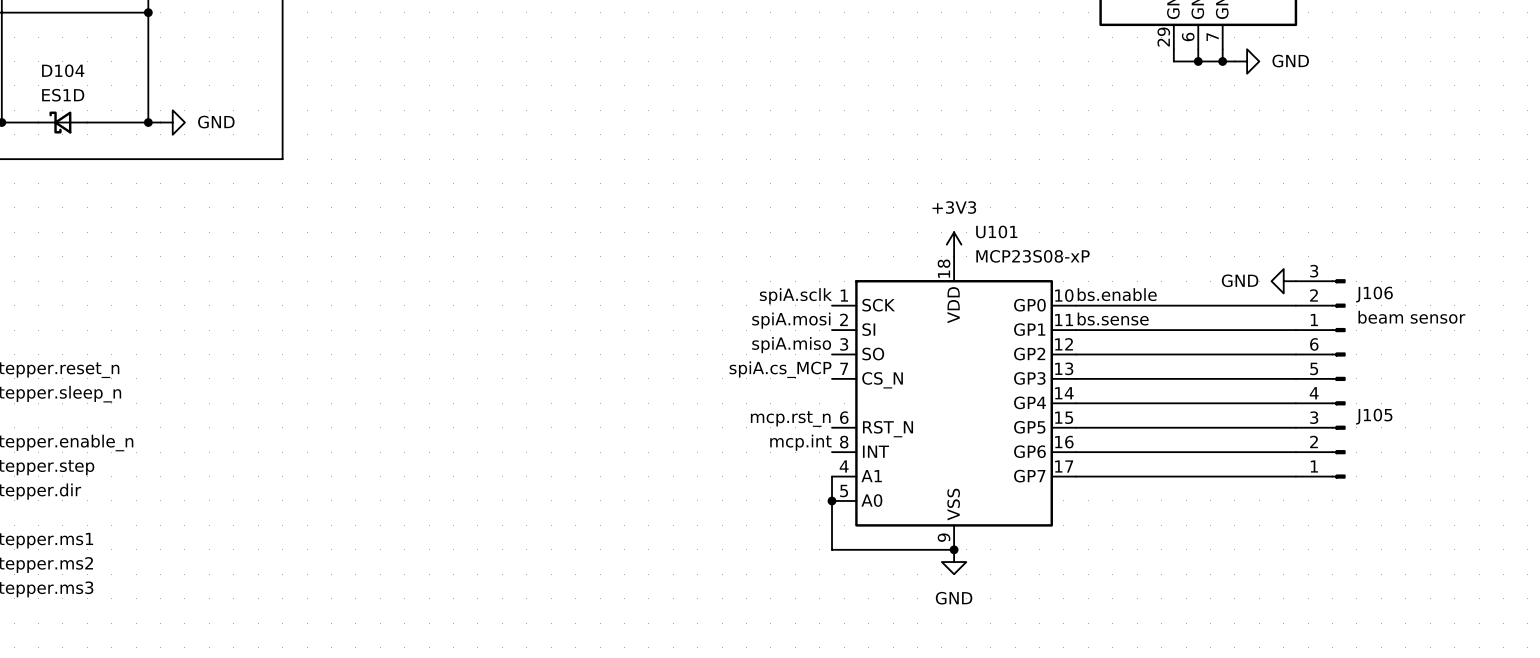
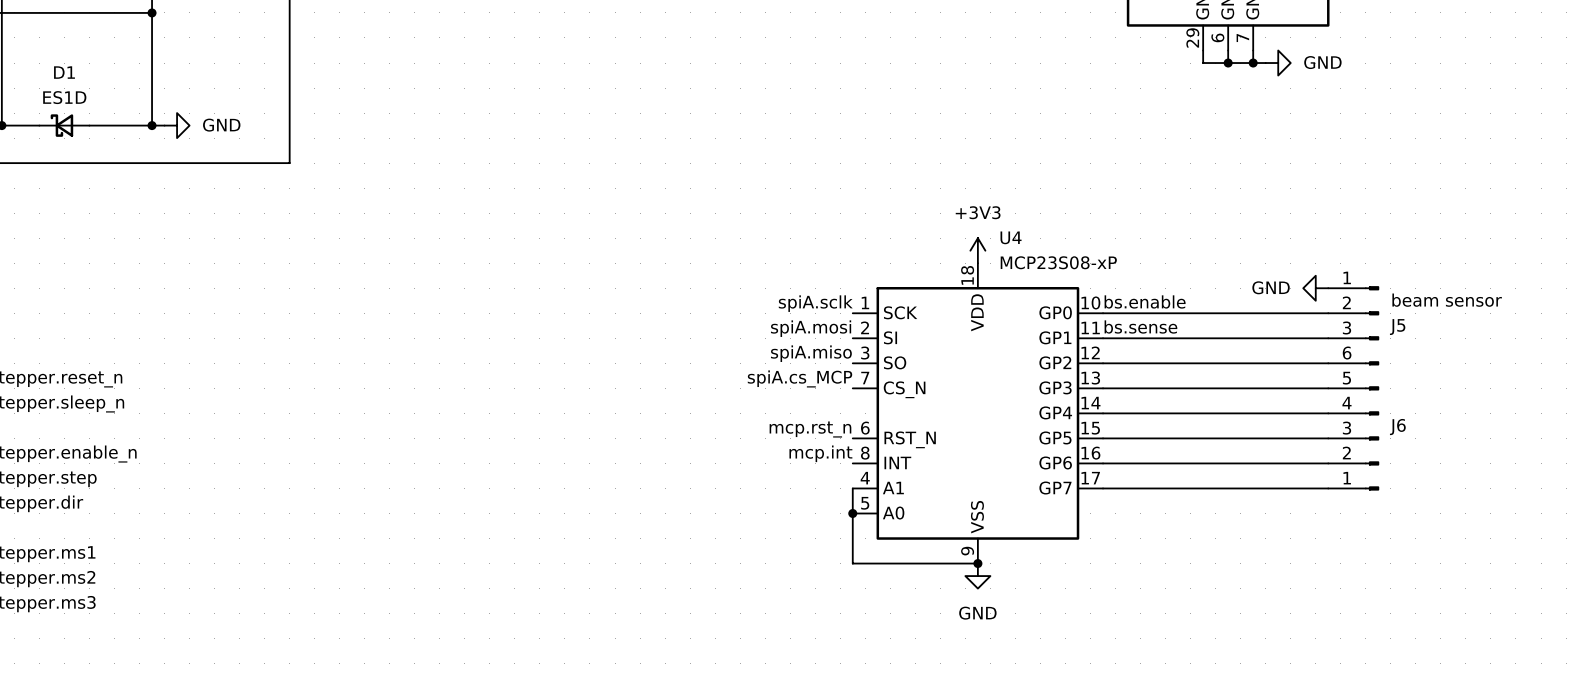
D104 name: D104 (63, 70) -> D1 (64, 72)
U101 name: U101 (996, 231) -> U4 (1011, 237)
J106 name: J106 (1374, 294) -> J5 (1397, 327)
J106 flip: as is (1338, 305) -> up-down (1372, 313)
J105 name: J105 (1374, 416) -> J6 (1397, 427)

